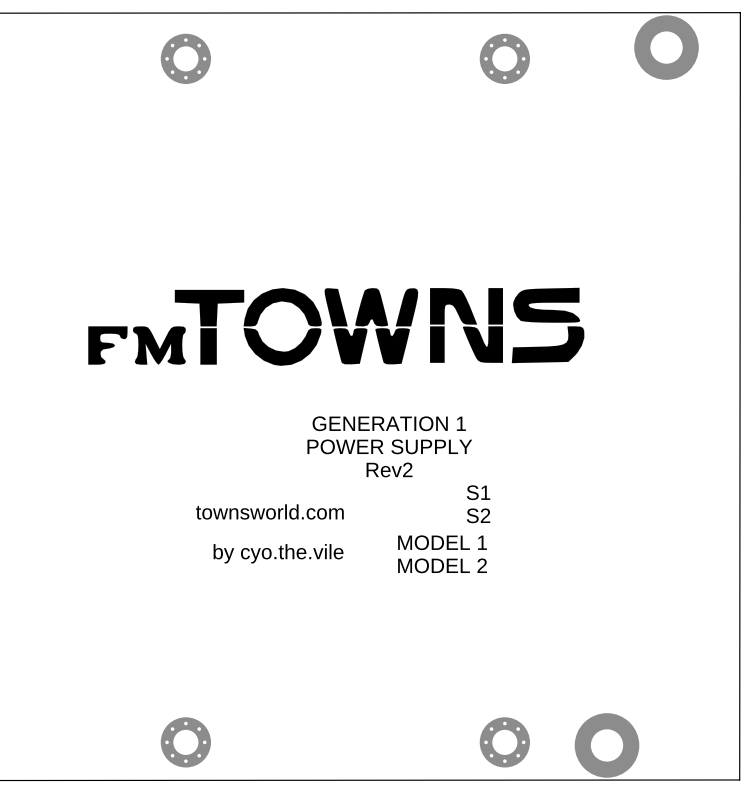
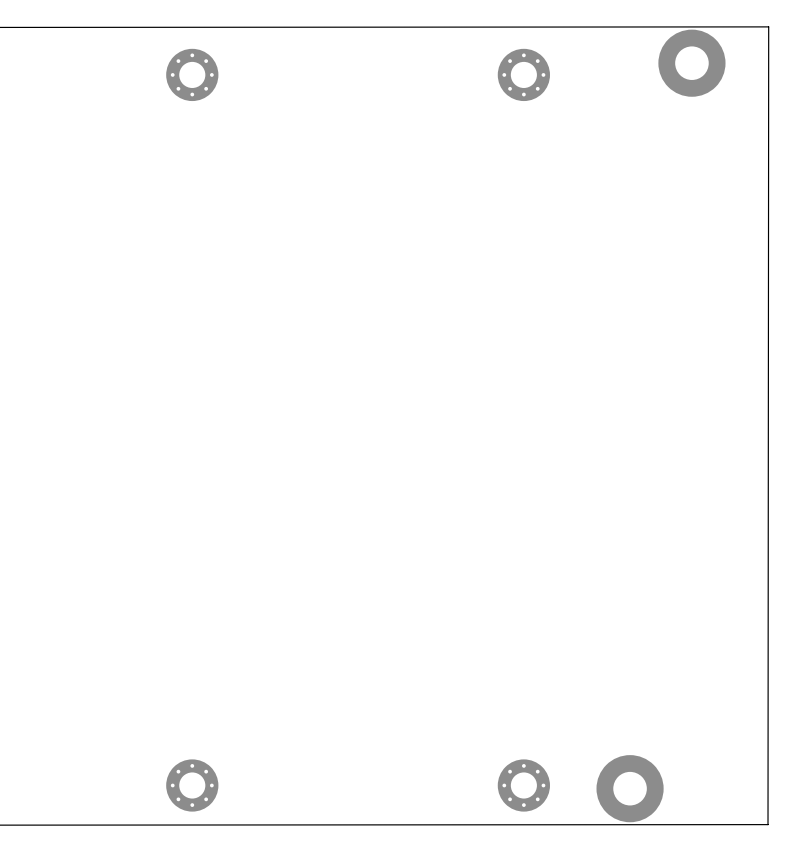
drawing: [88, 287, 585, 366] -> none
text: GENERATION 1 (389, 423) -> none
text: POWER SUPPLY (389, 446) -> none
text: Rev2 (389, 469) -> none
text: S1 (478, 492) -> none
text: townsworld.com (269, 511) -> none
text: S2 (478, 515) -> none
text: MODEL 1 (442, 542) -> none
text: by cyo.the.vile (278, 553) -> none
text: MODEL 2 (442, 565) -> none

